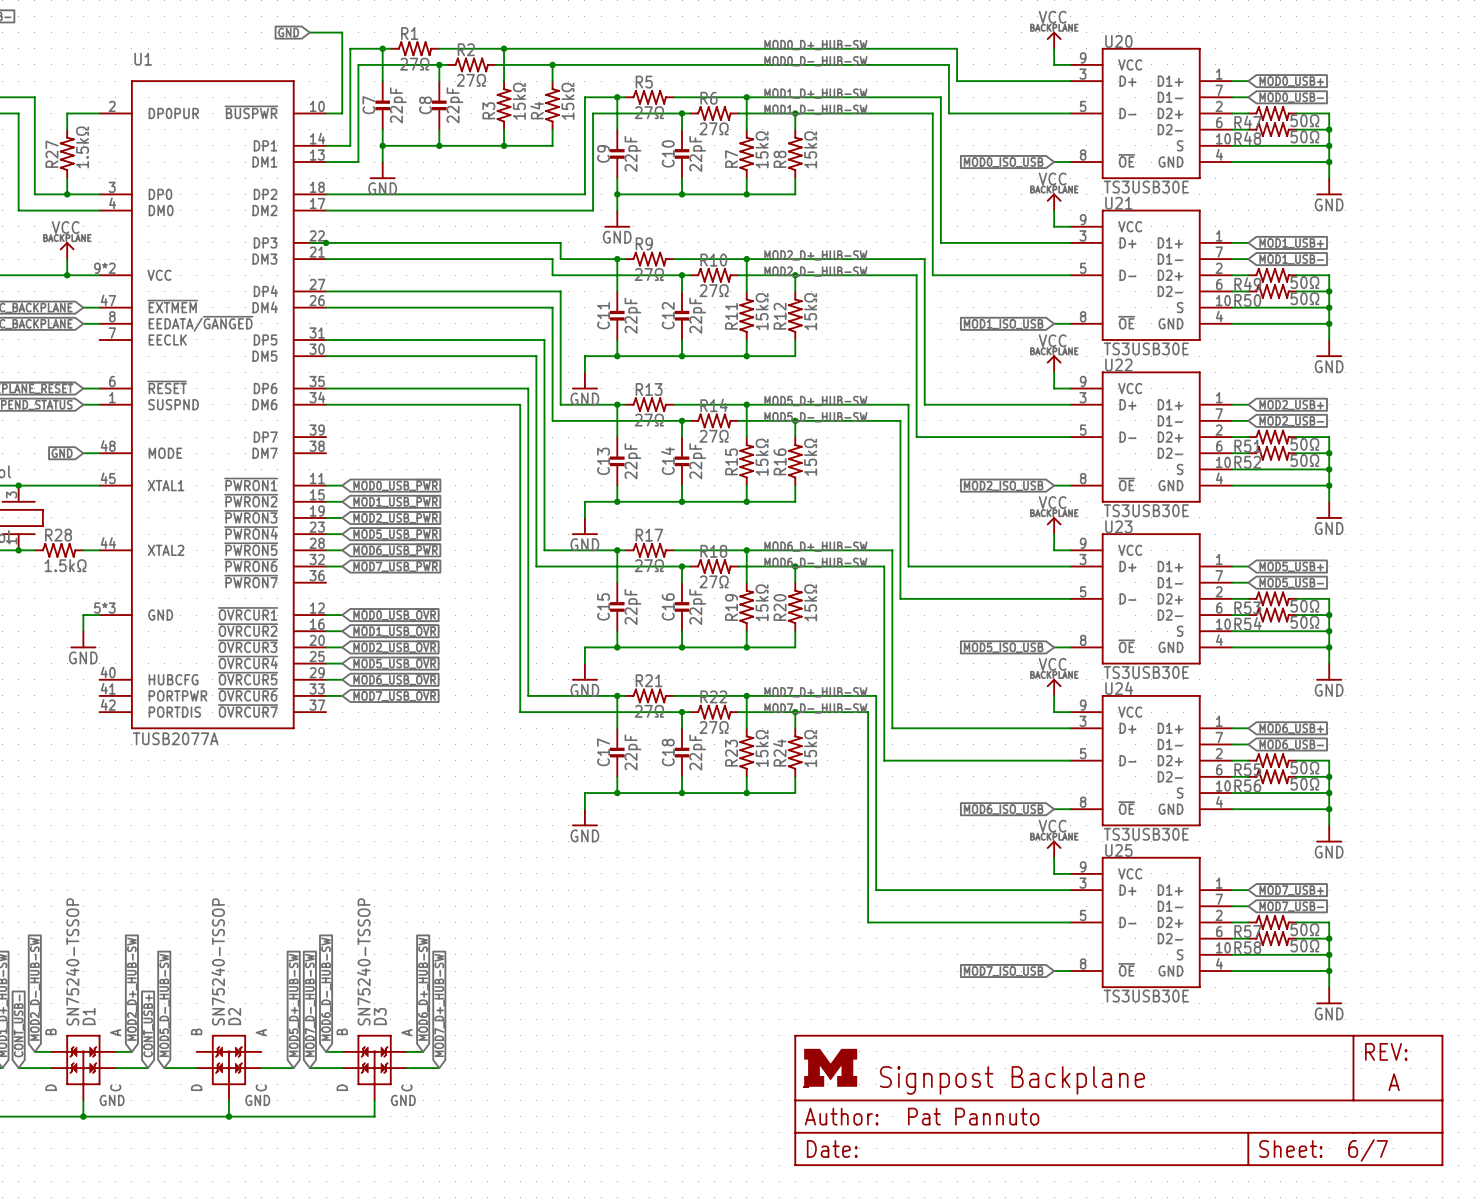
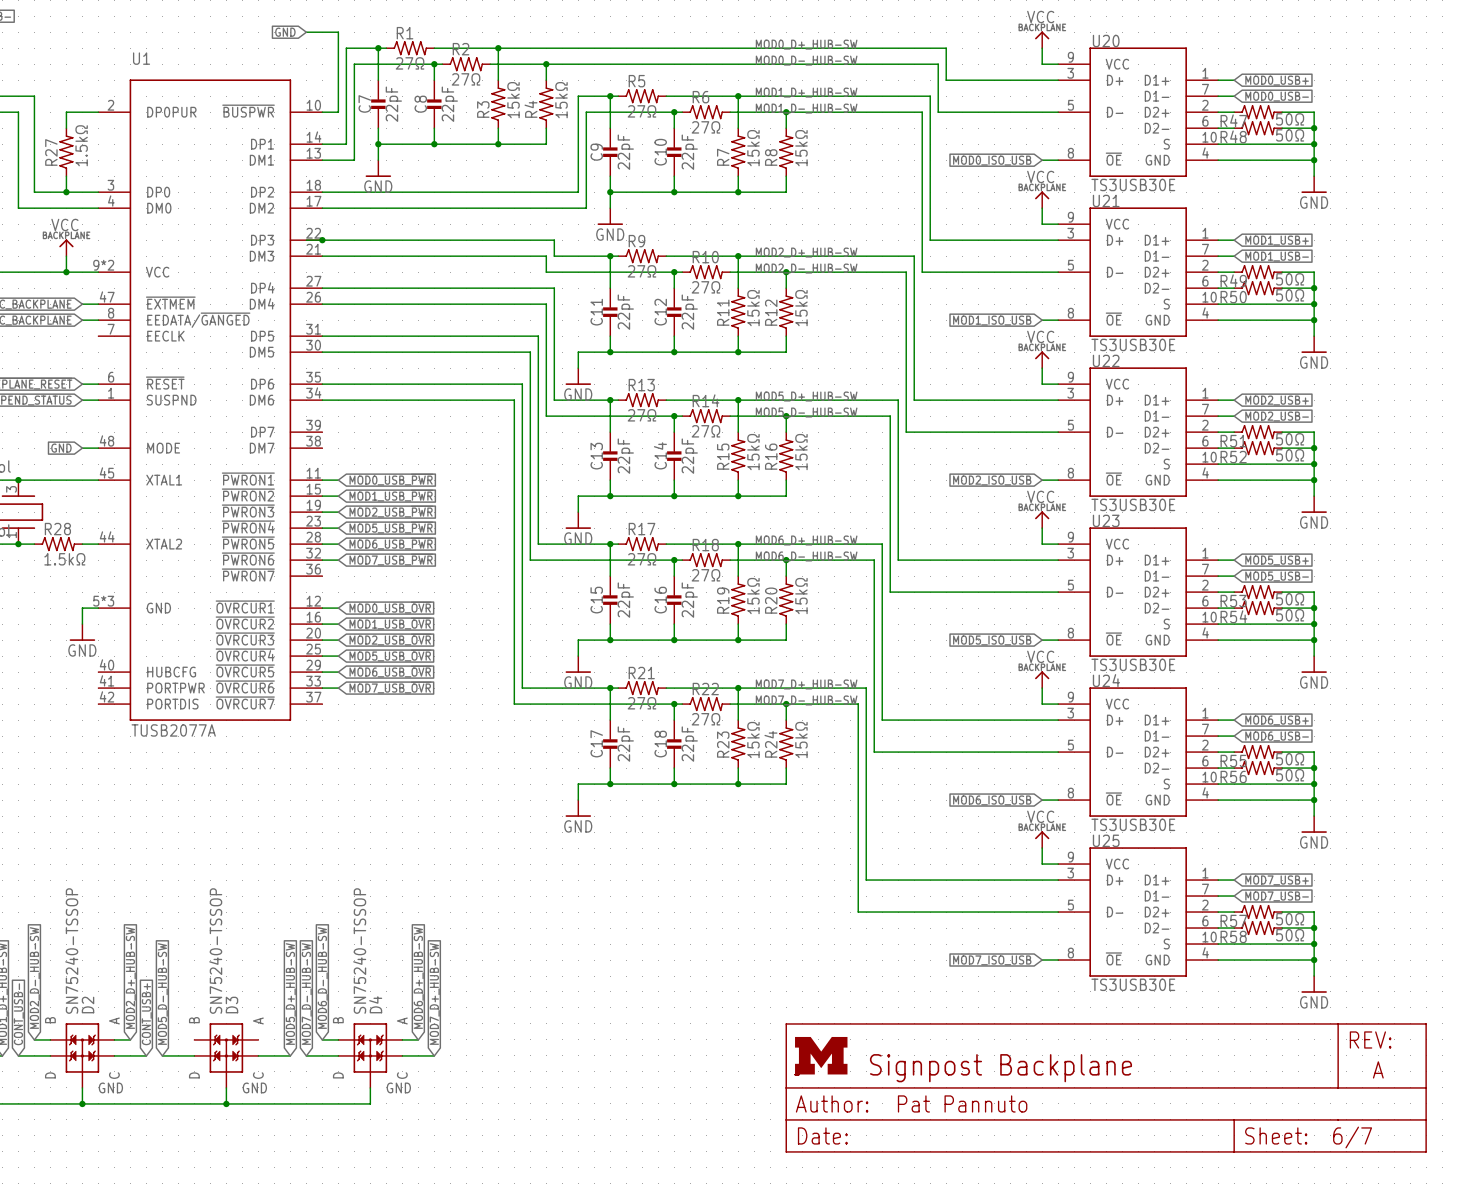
D1 name: D1 (89, 1016) -> D2 (88, 1005)
D2 name: D2 (234, 1016) -> D3 (231, 1005)
D3 name: D3 (380, 1016) -> D4 (375, 1004)

